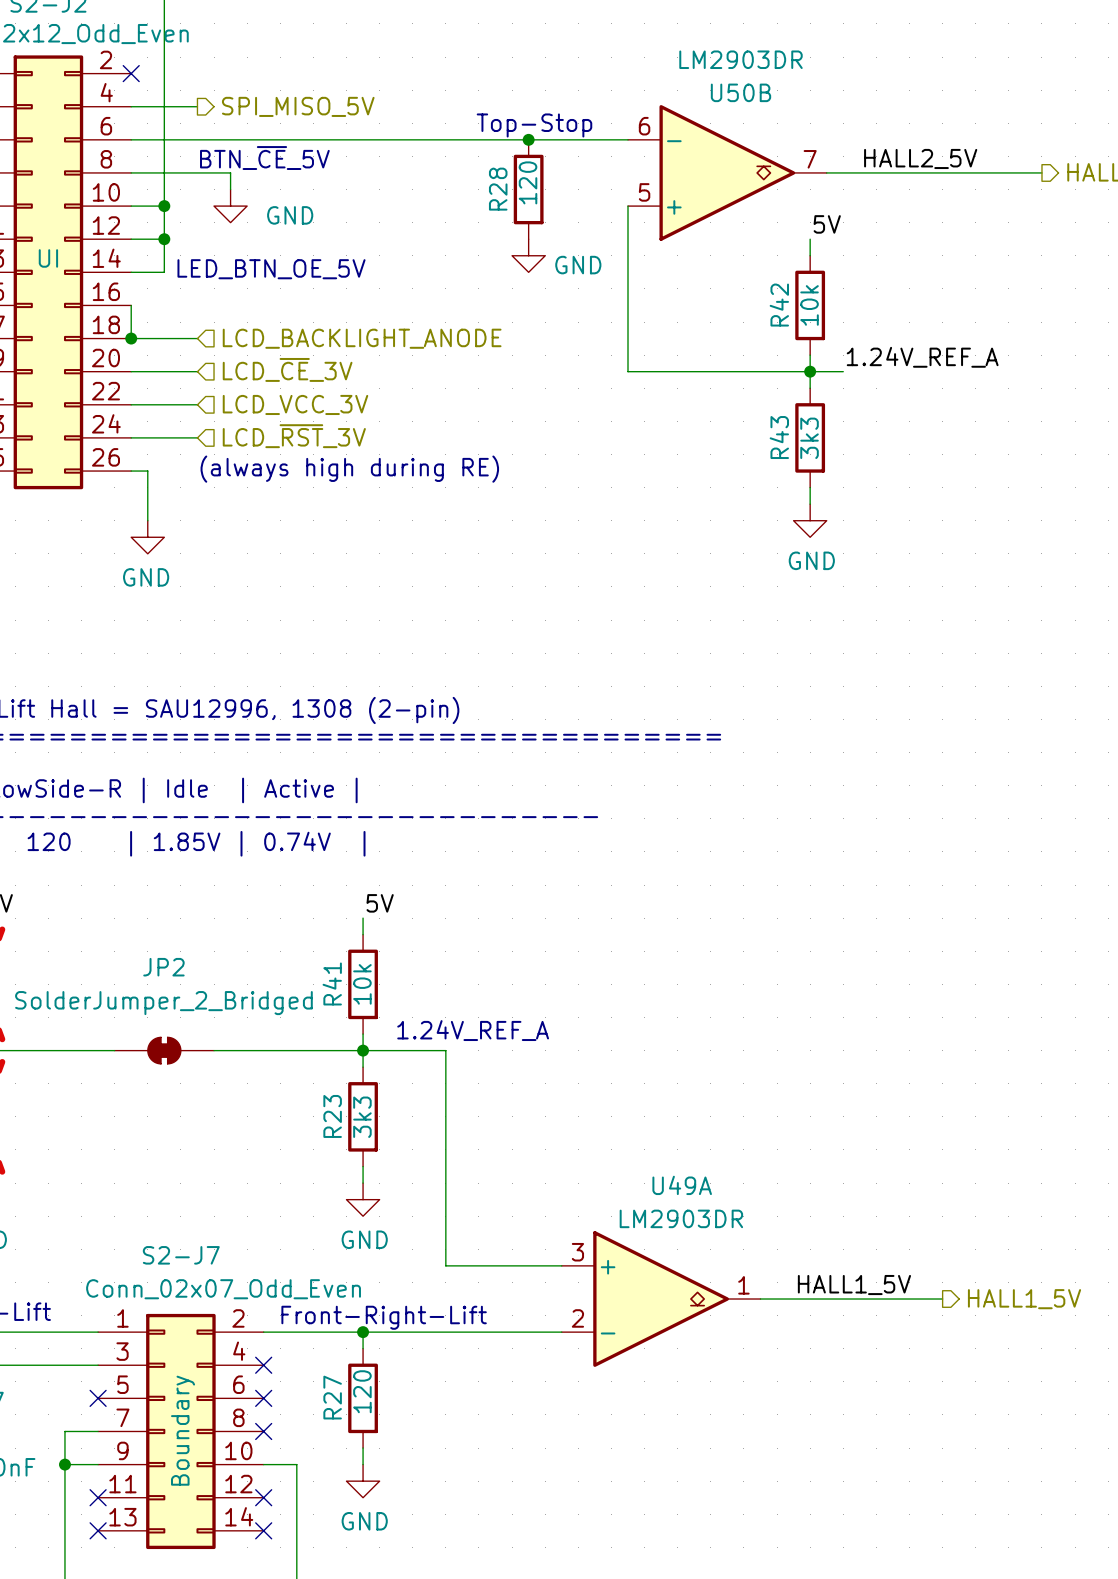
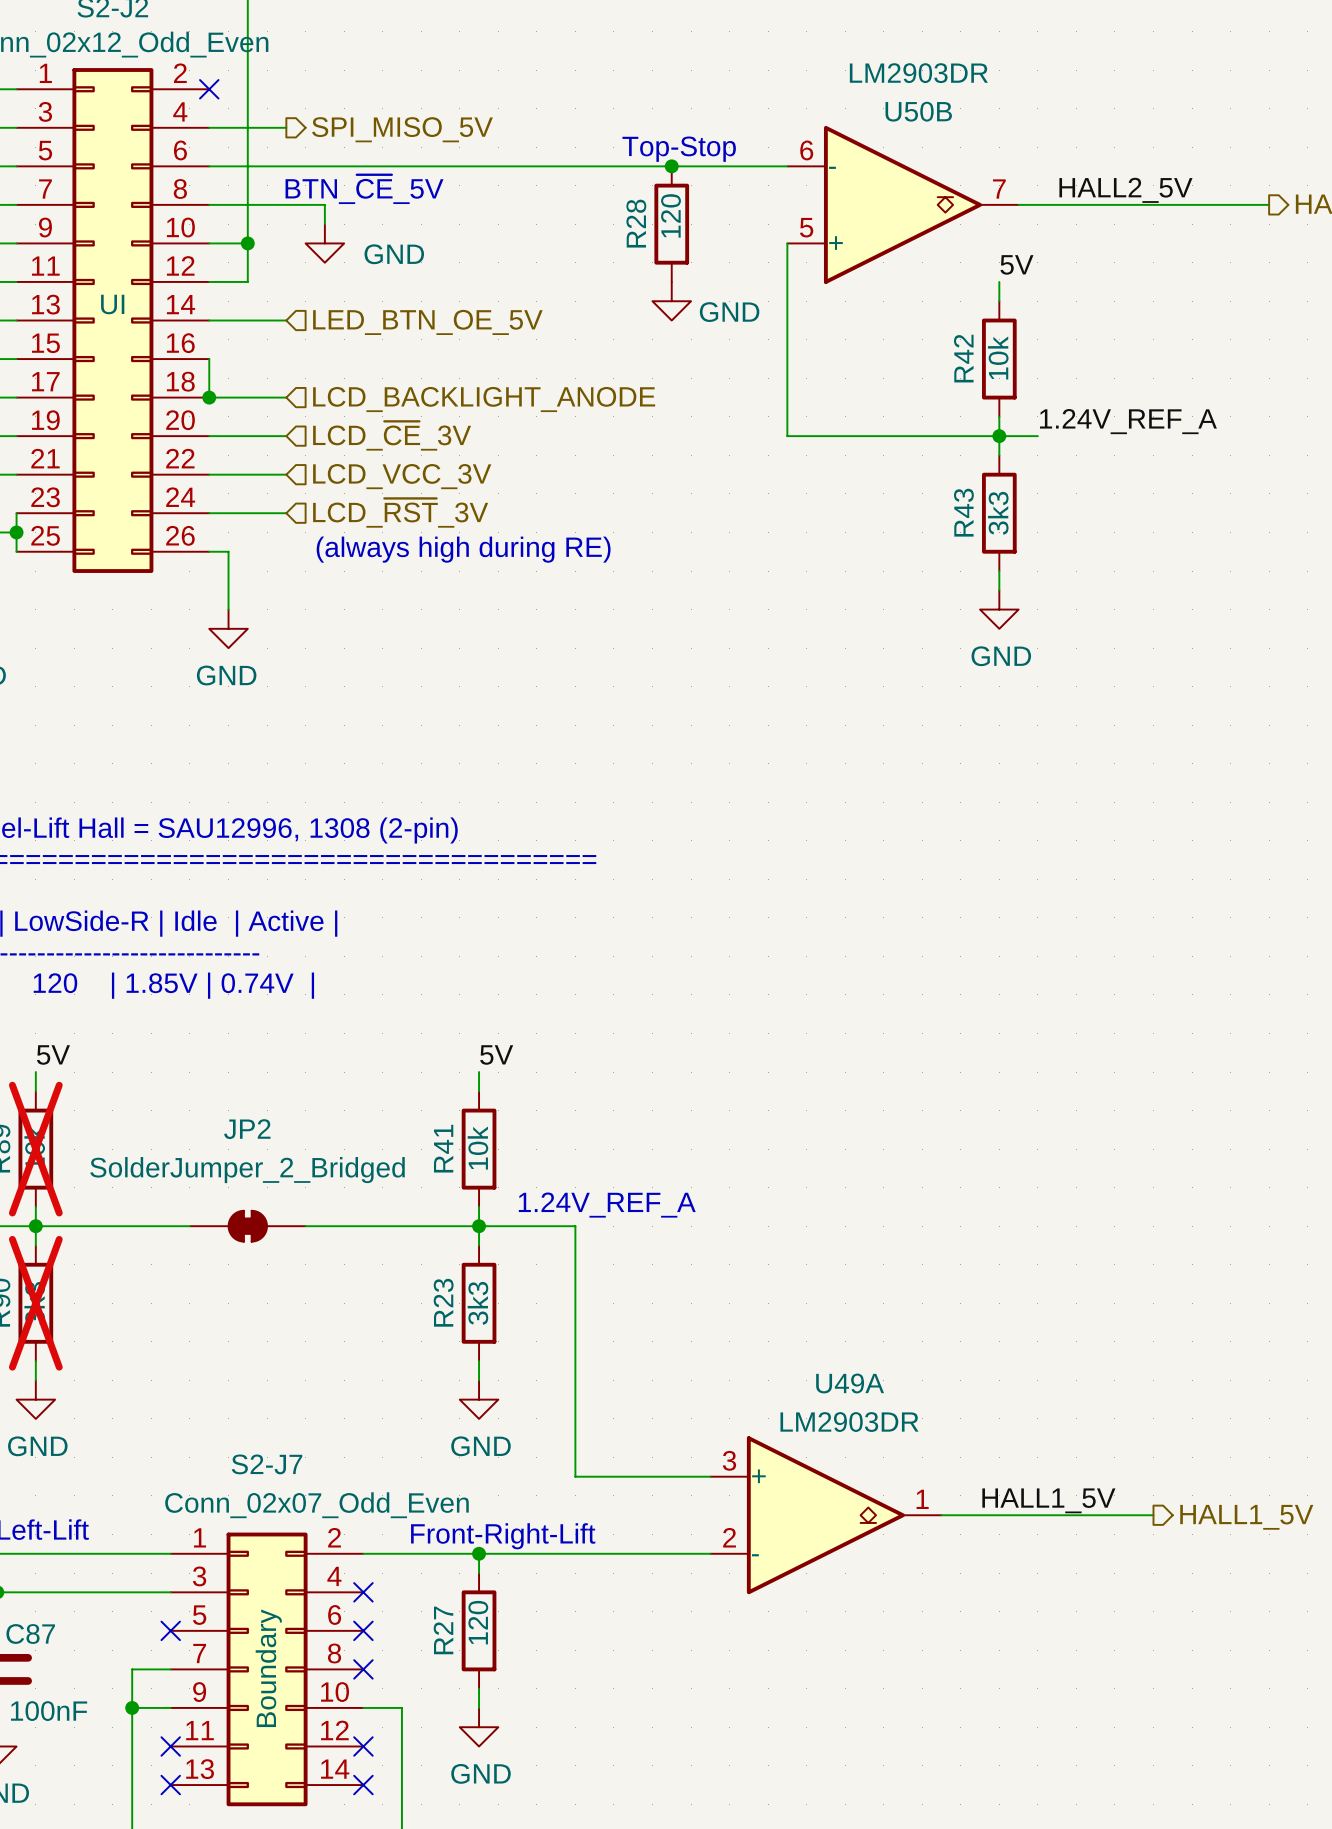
wire: (164, 239) (164, 272) -> (286, 320) (247, 320)
junction: (164, 239) -> none
text: LED_BTN_OE_5V (271, 269) -> none
hierarchical label: none -> LED_BTN_OE_5V (427, 322)

